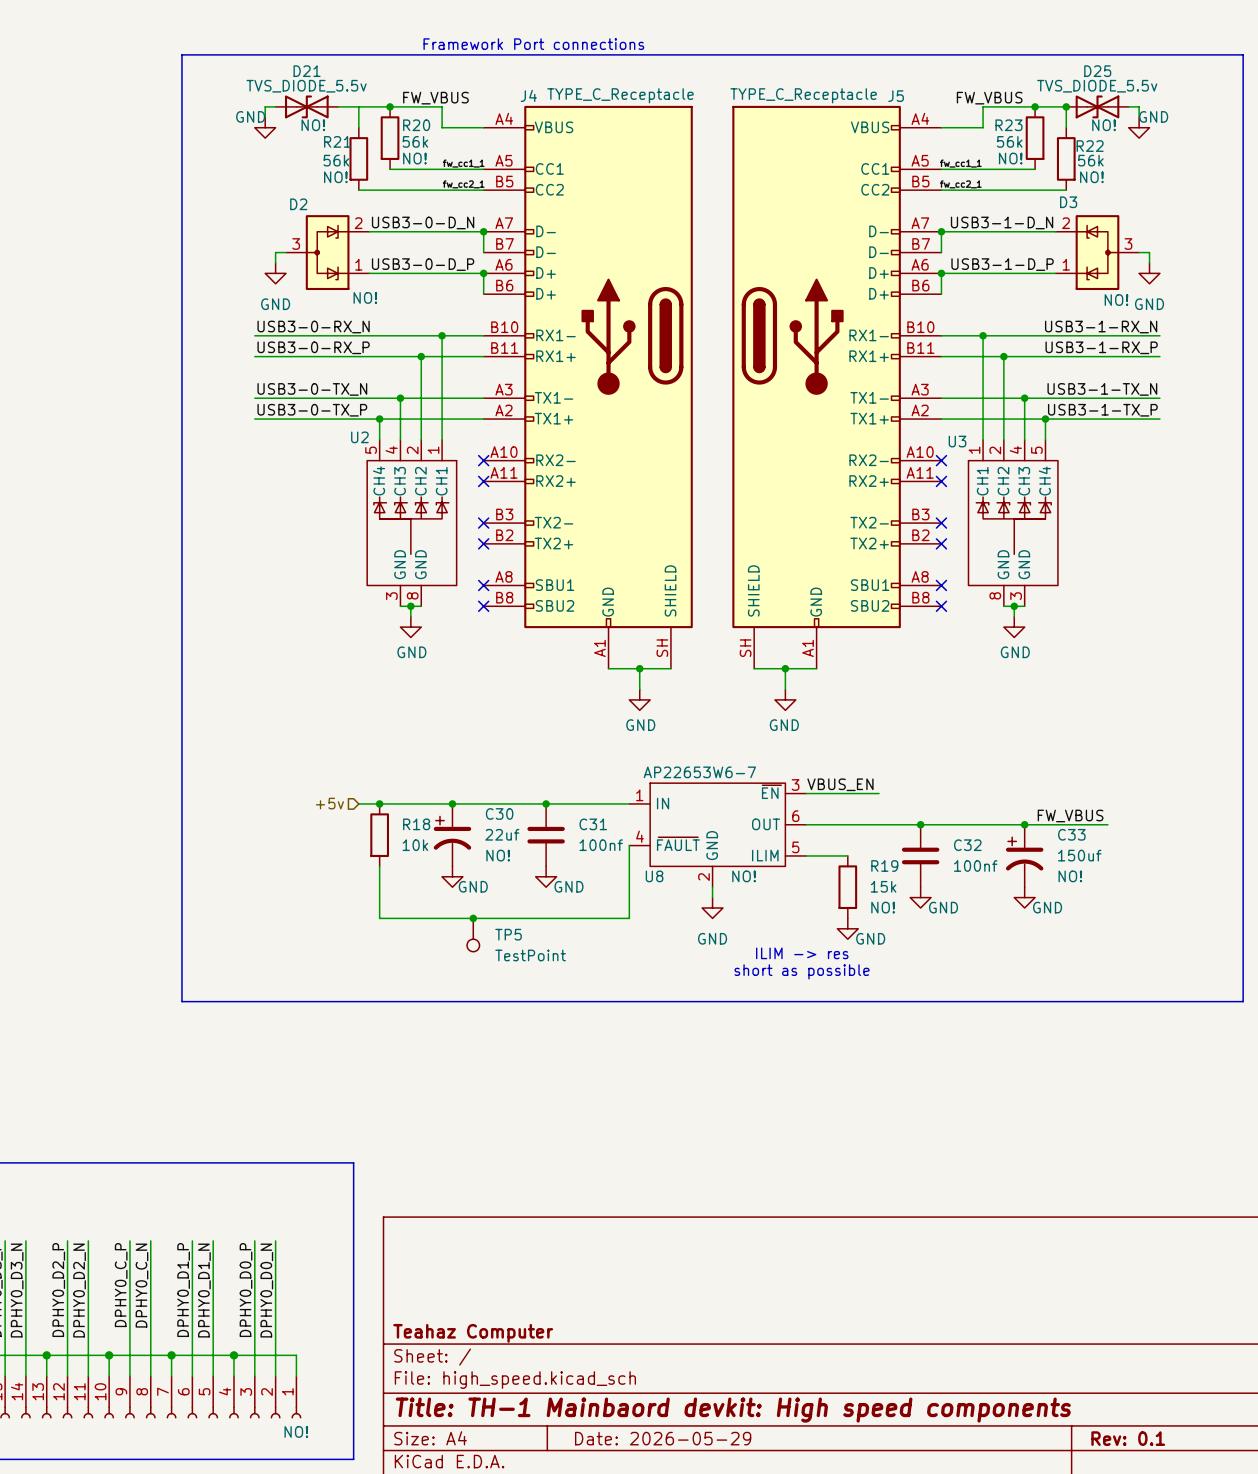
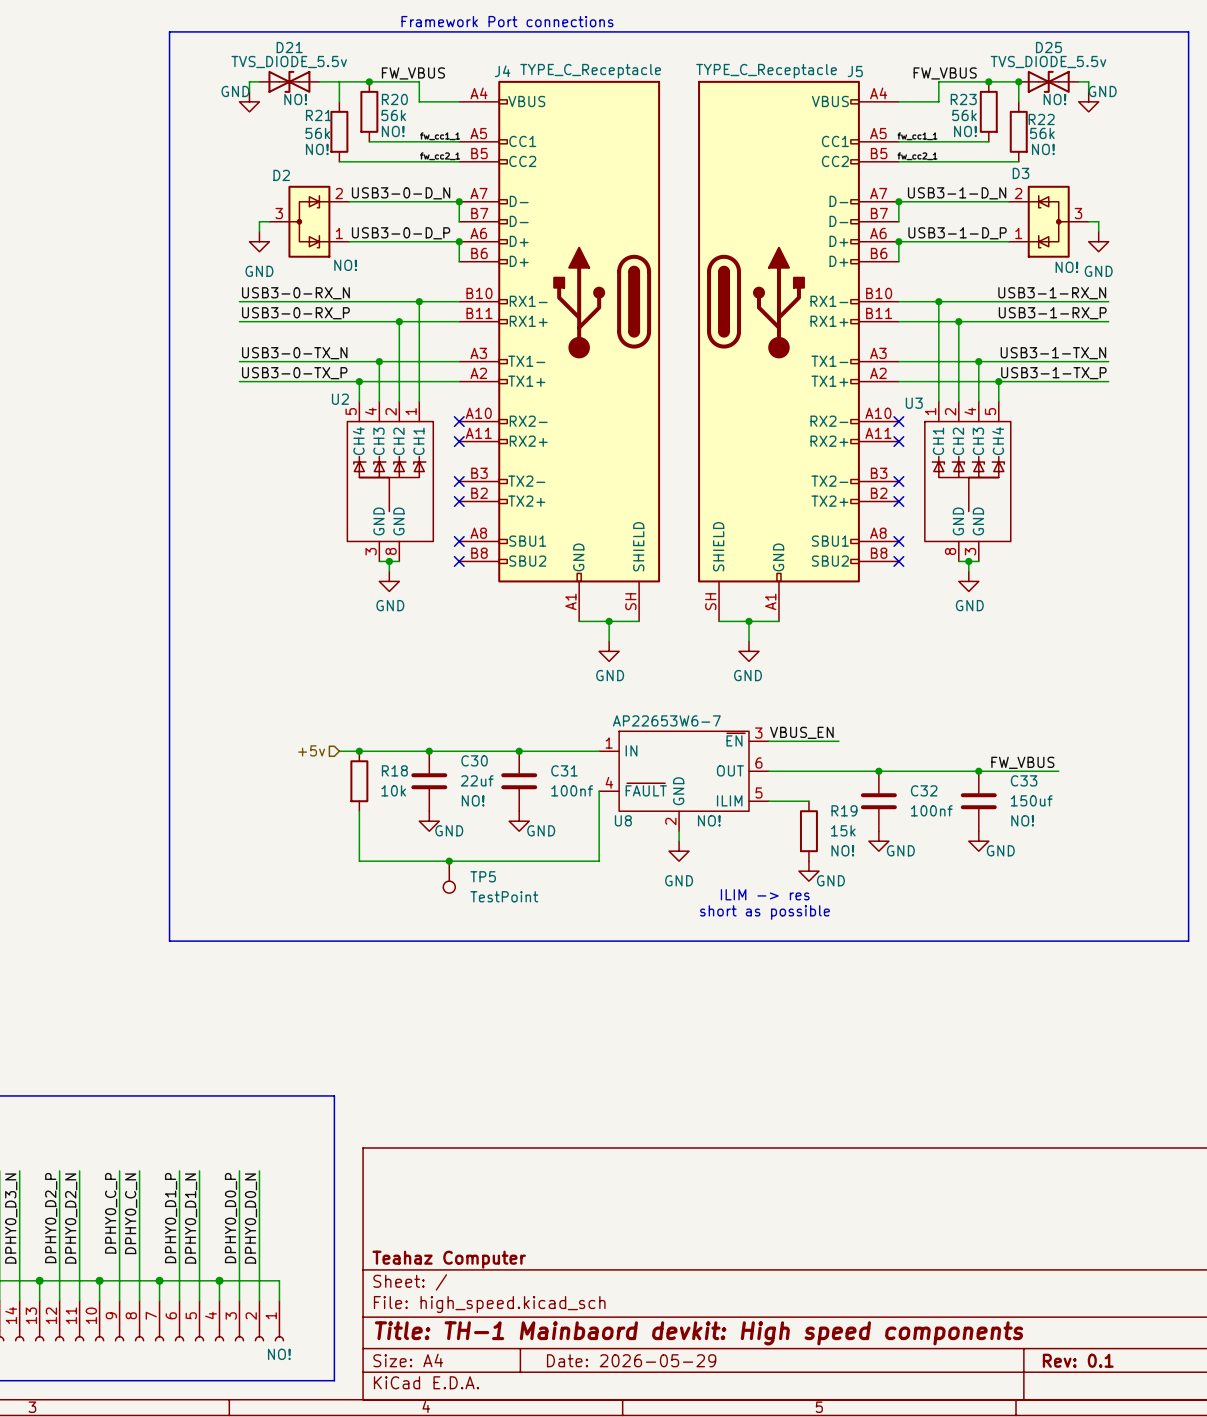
C30 symbol: [433, 803, 472, 867] -> [411, 751, 448, 812]
C33 symbol: [1005, 824, 1044, 888] -> [960, 771, 997, 832]

